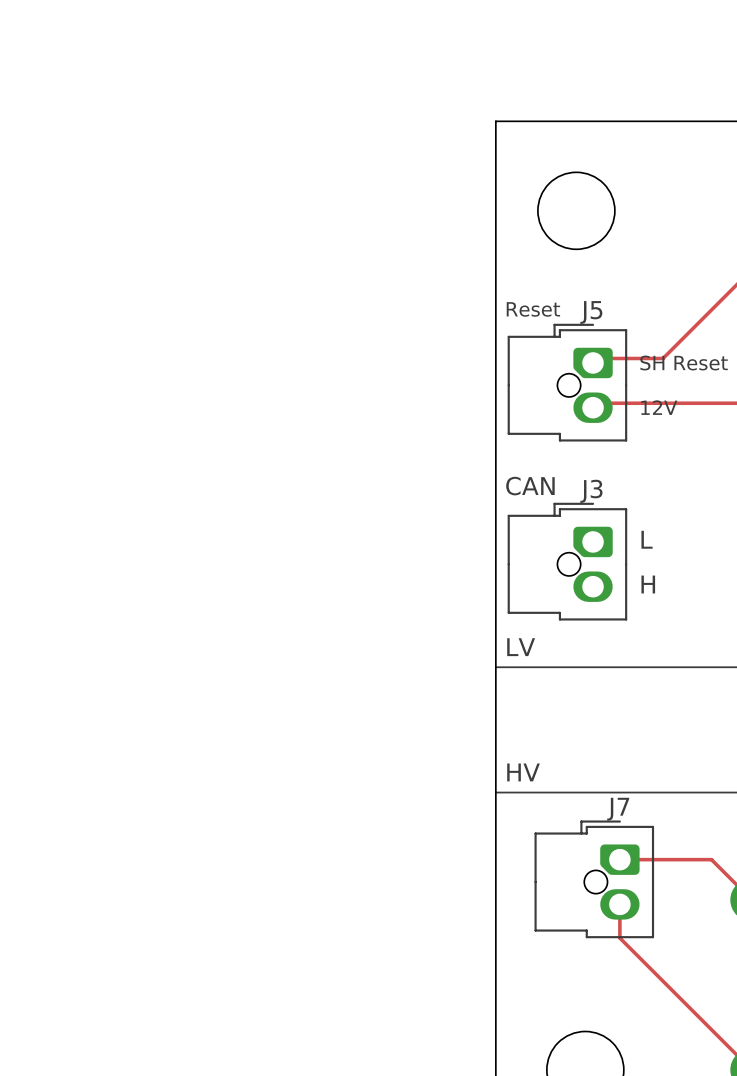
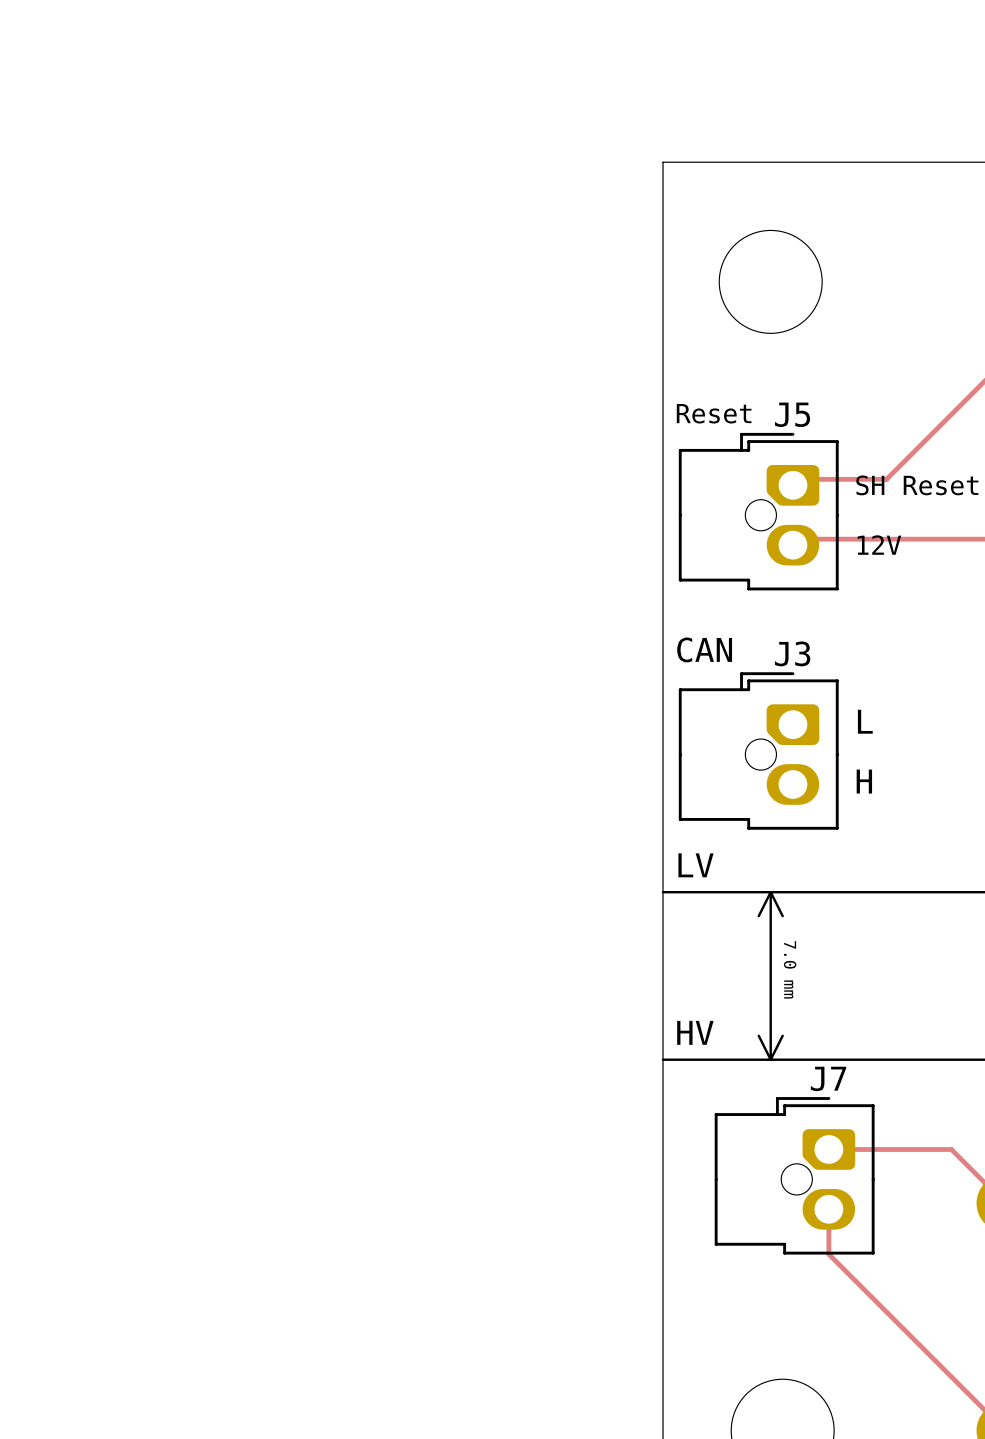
line: none -> (770, 892) (782, 916)
line: none -> (770, 892) (758, 916)
line: none -> (770, 892) (770, 1059)
text: none -> 7.0 mm (790, 969)
line: none -> (758, 1035) (770, 1059)
line: none -> (782, 1035) (770, 1059)

